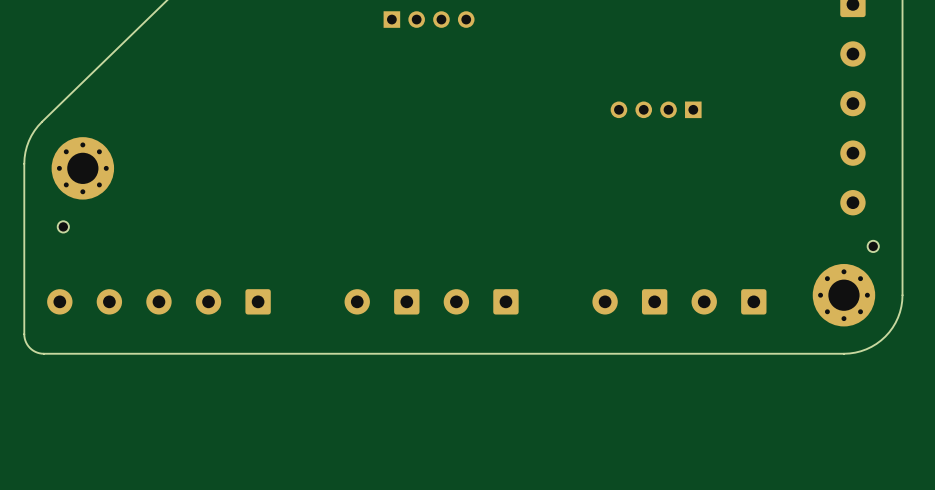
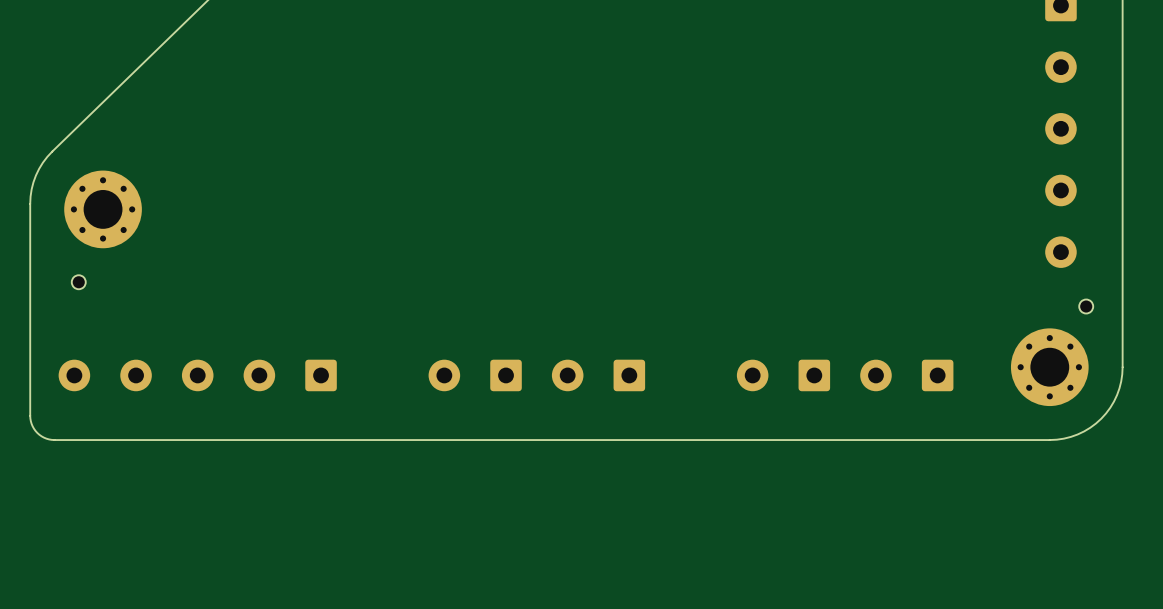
part: (429, 19) -> none
part: (656, 109) -> none

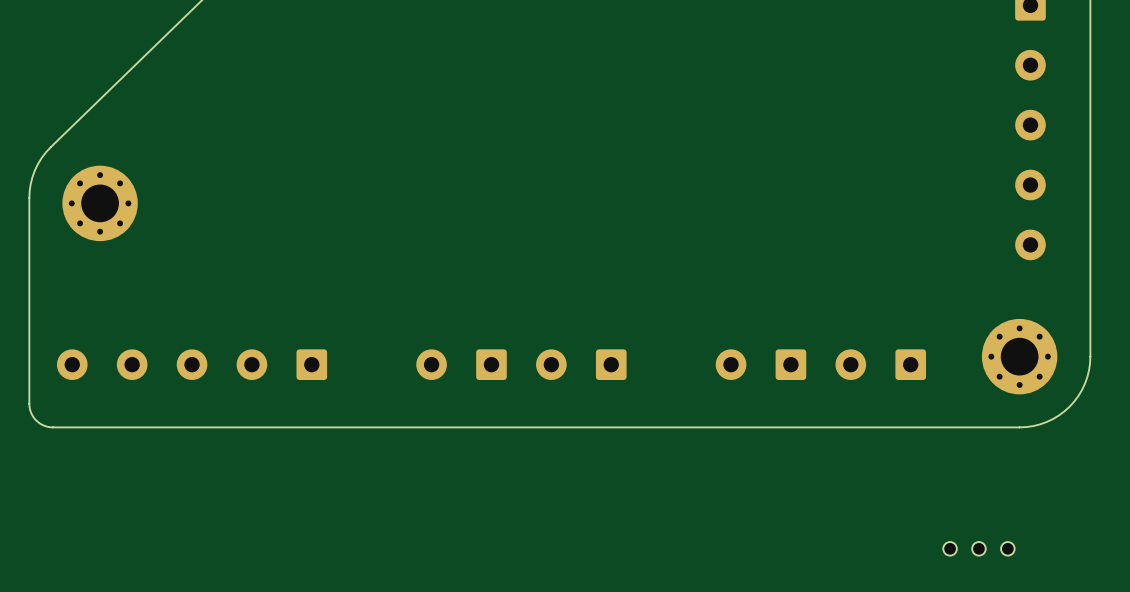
part: (78, 282) -> none
part: (1086, 306) -> none
part: none -> (950, 548)
part: none -> (978, 548)
part: none -> (1007, 548)

